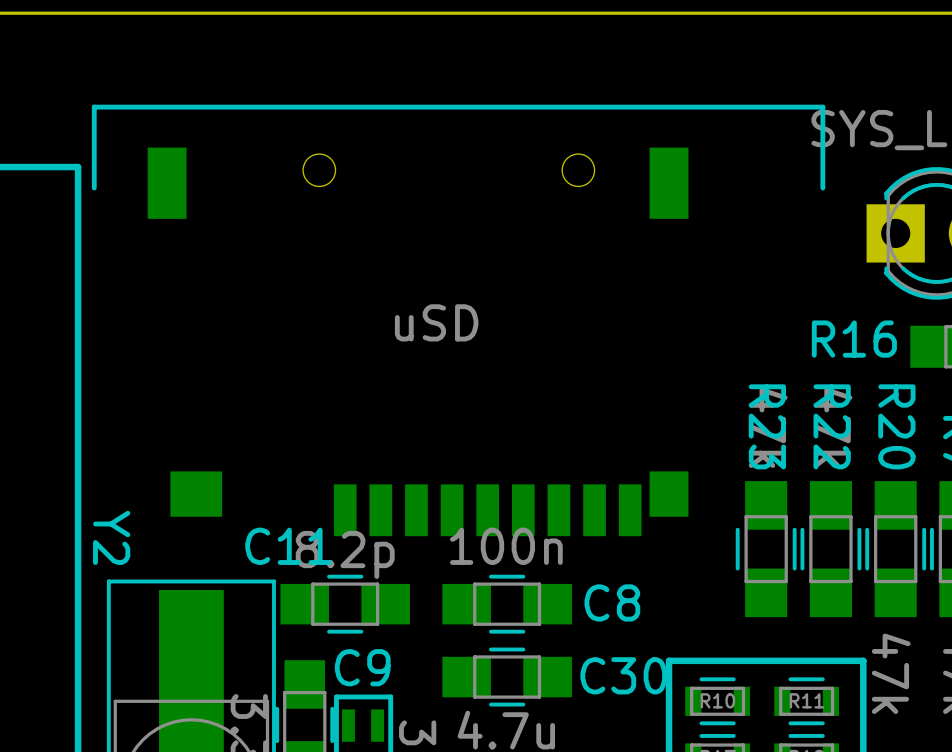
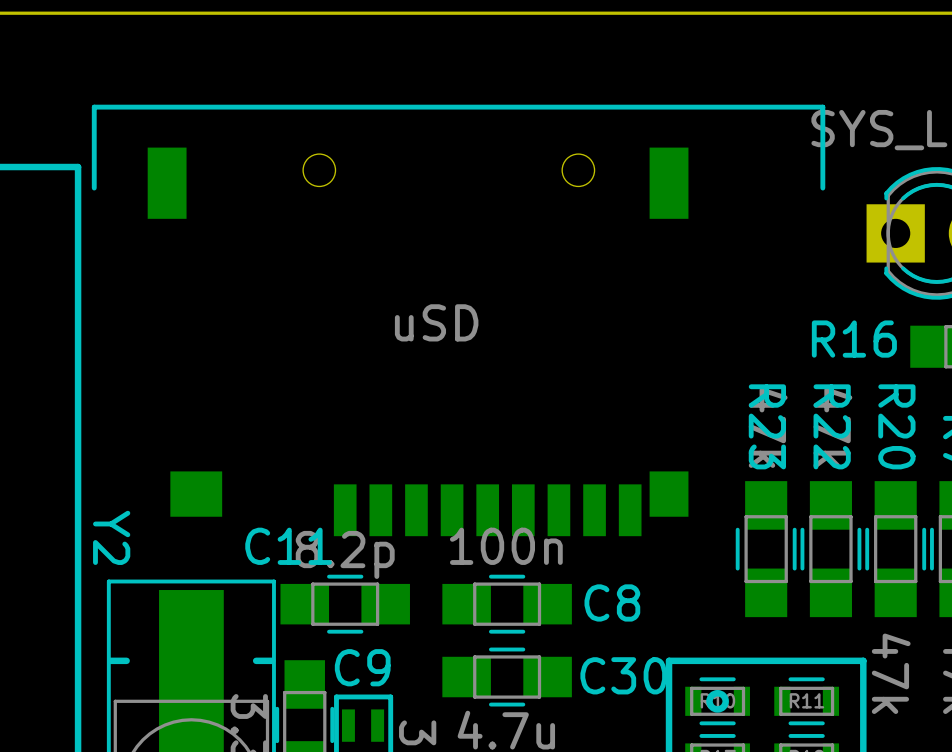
line: none -> (126, 660) (110, 660)
line: none -> (272, 660) (256, 660)
drawing: none -> [706, 689, 729, 713]

